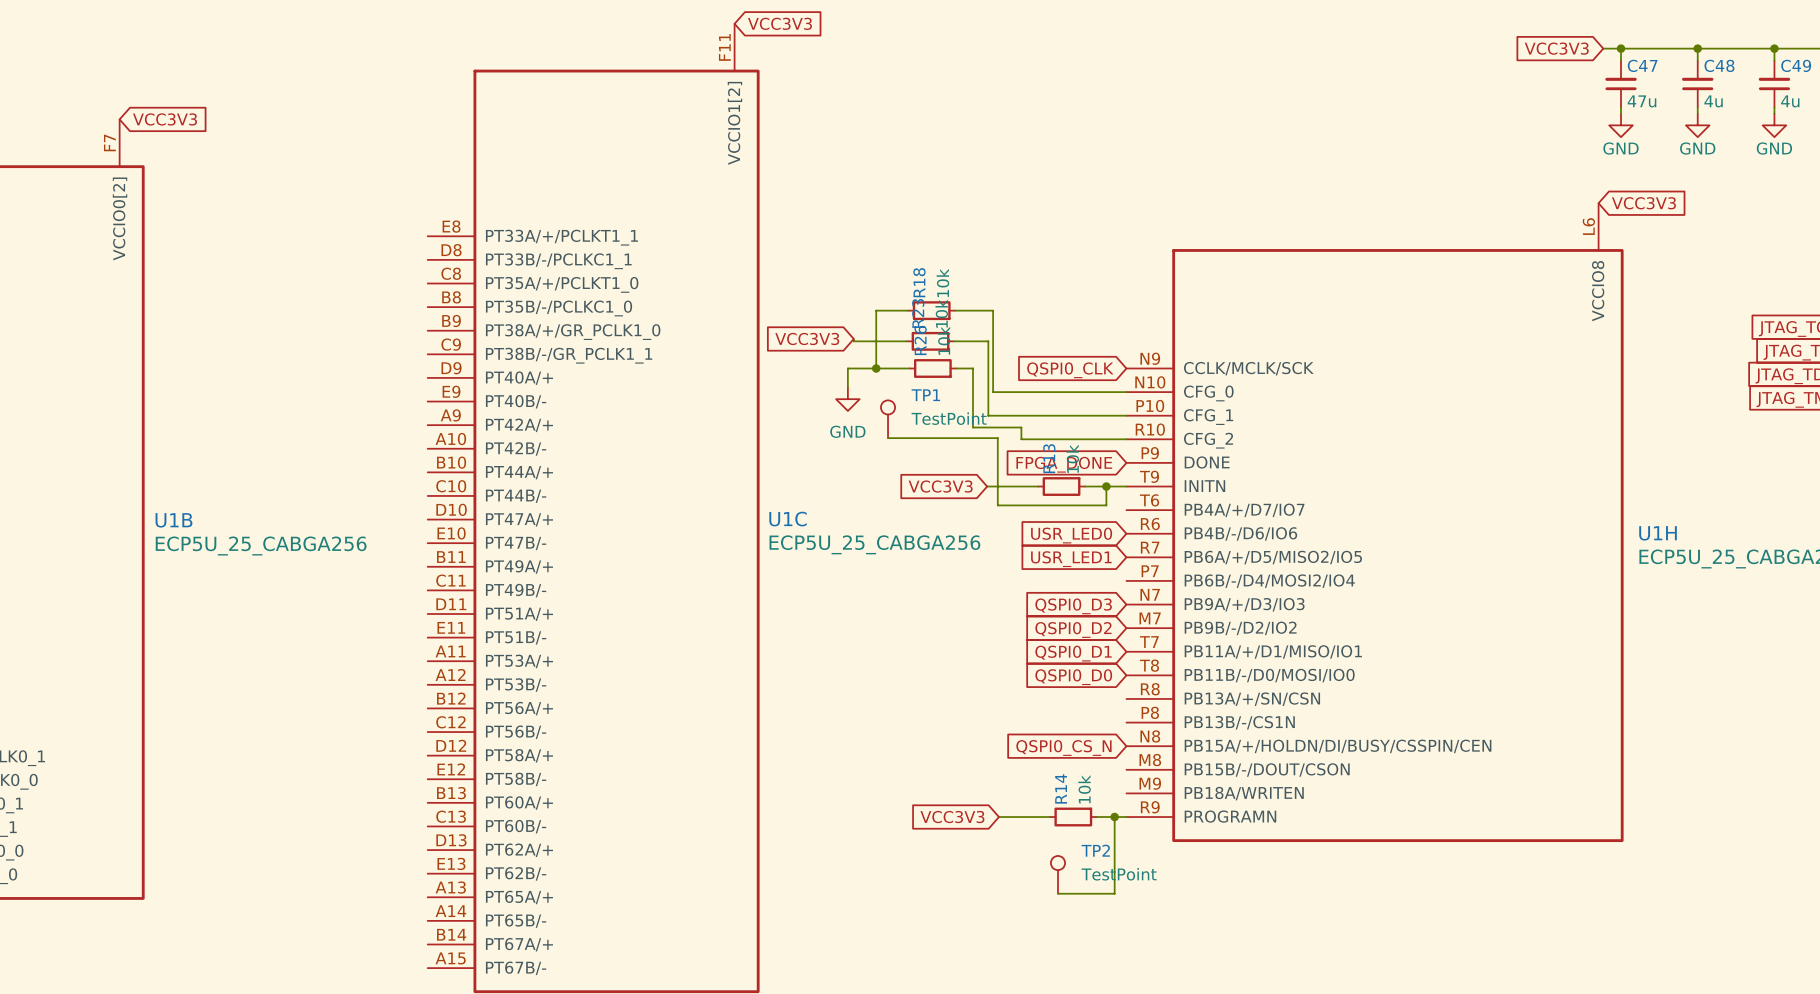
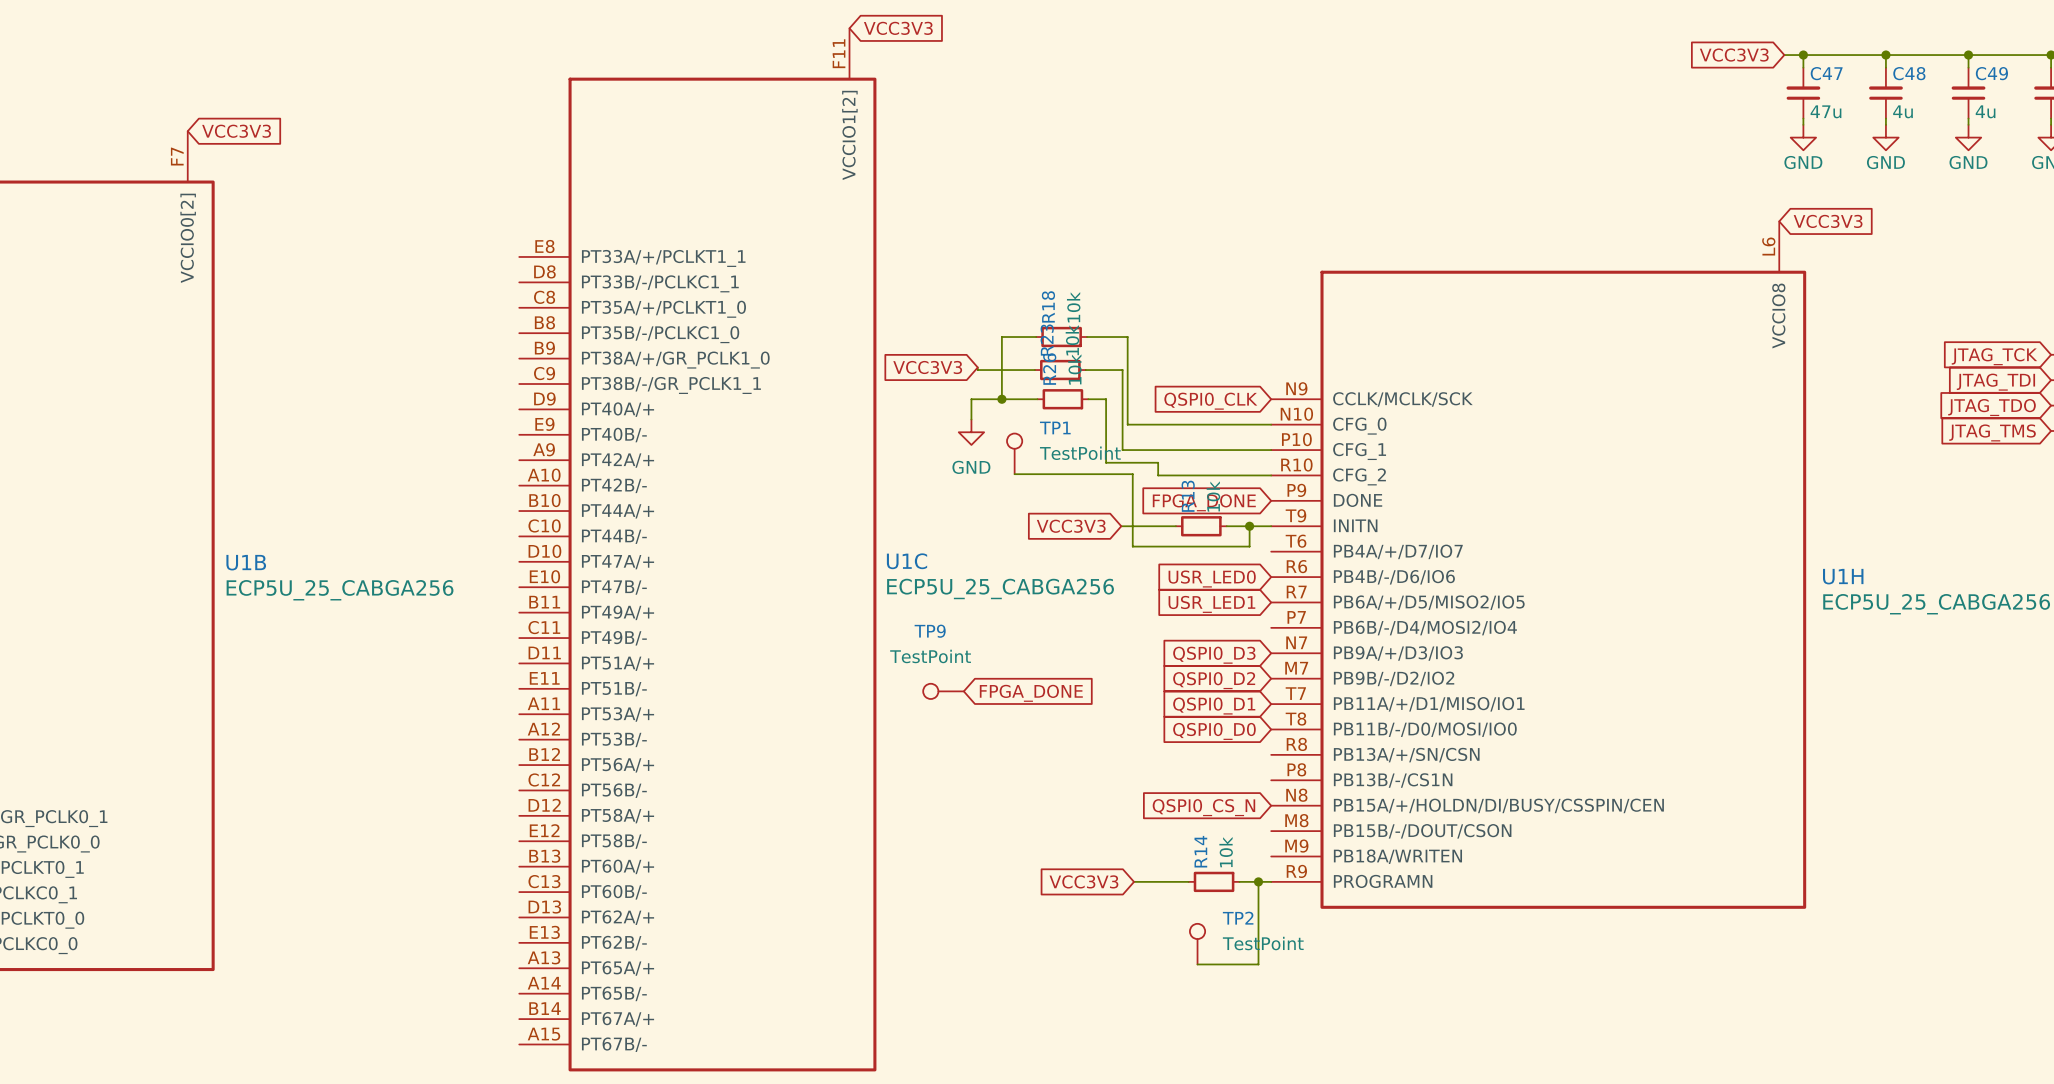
TP9: none -> TestPoint (943, 691)
global label: none -> FPGA_DONE (1031, 693)

